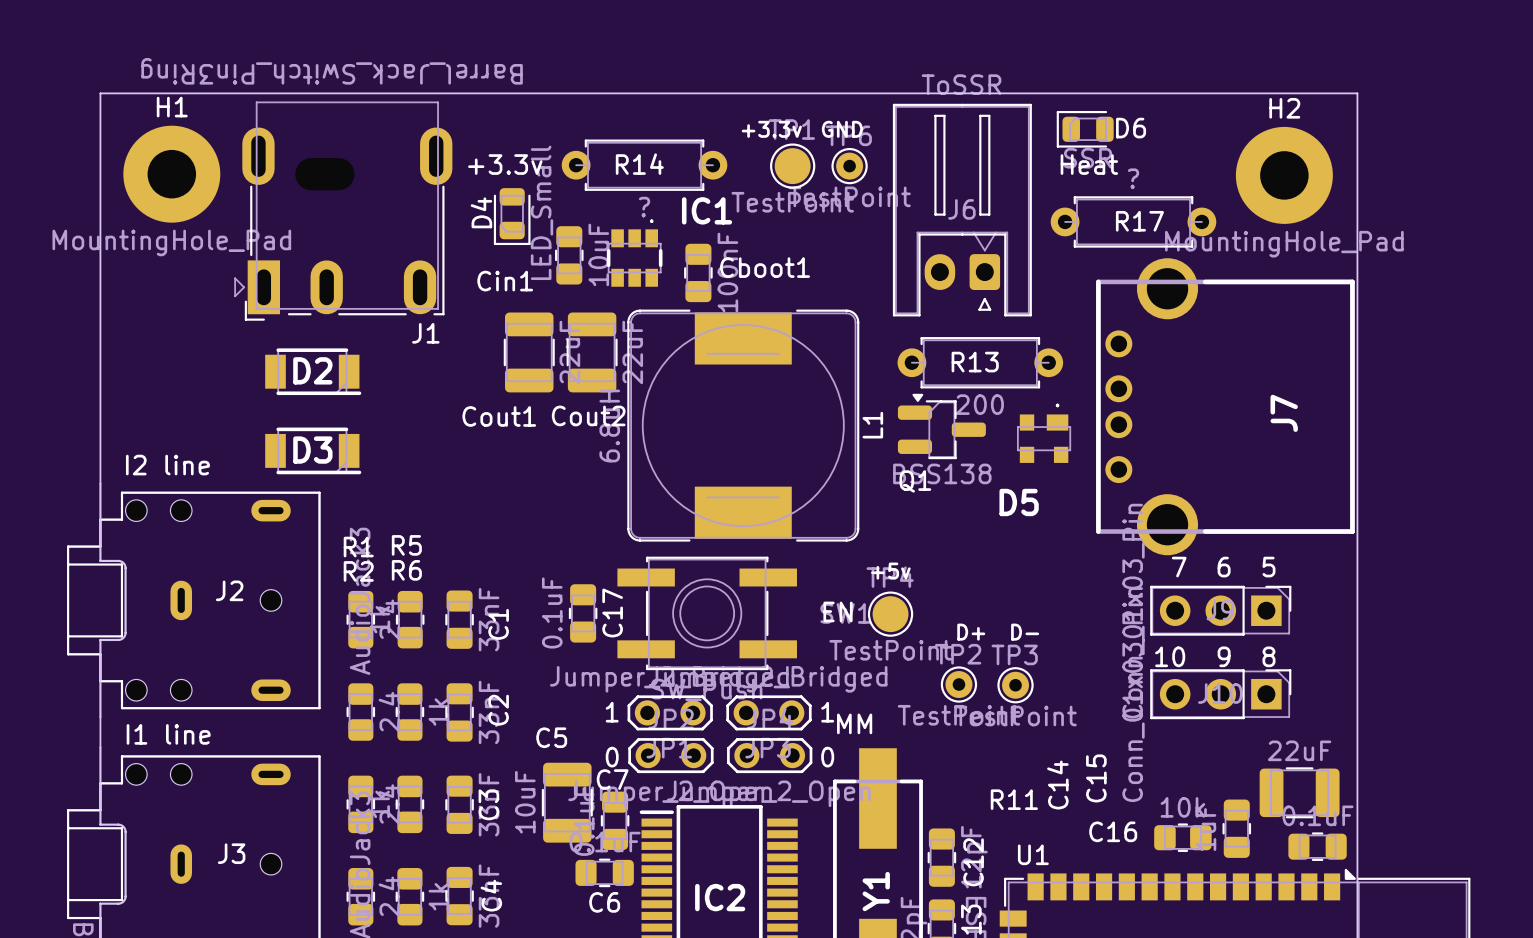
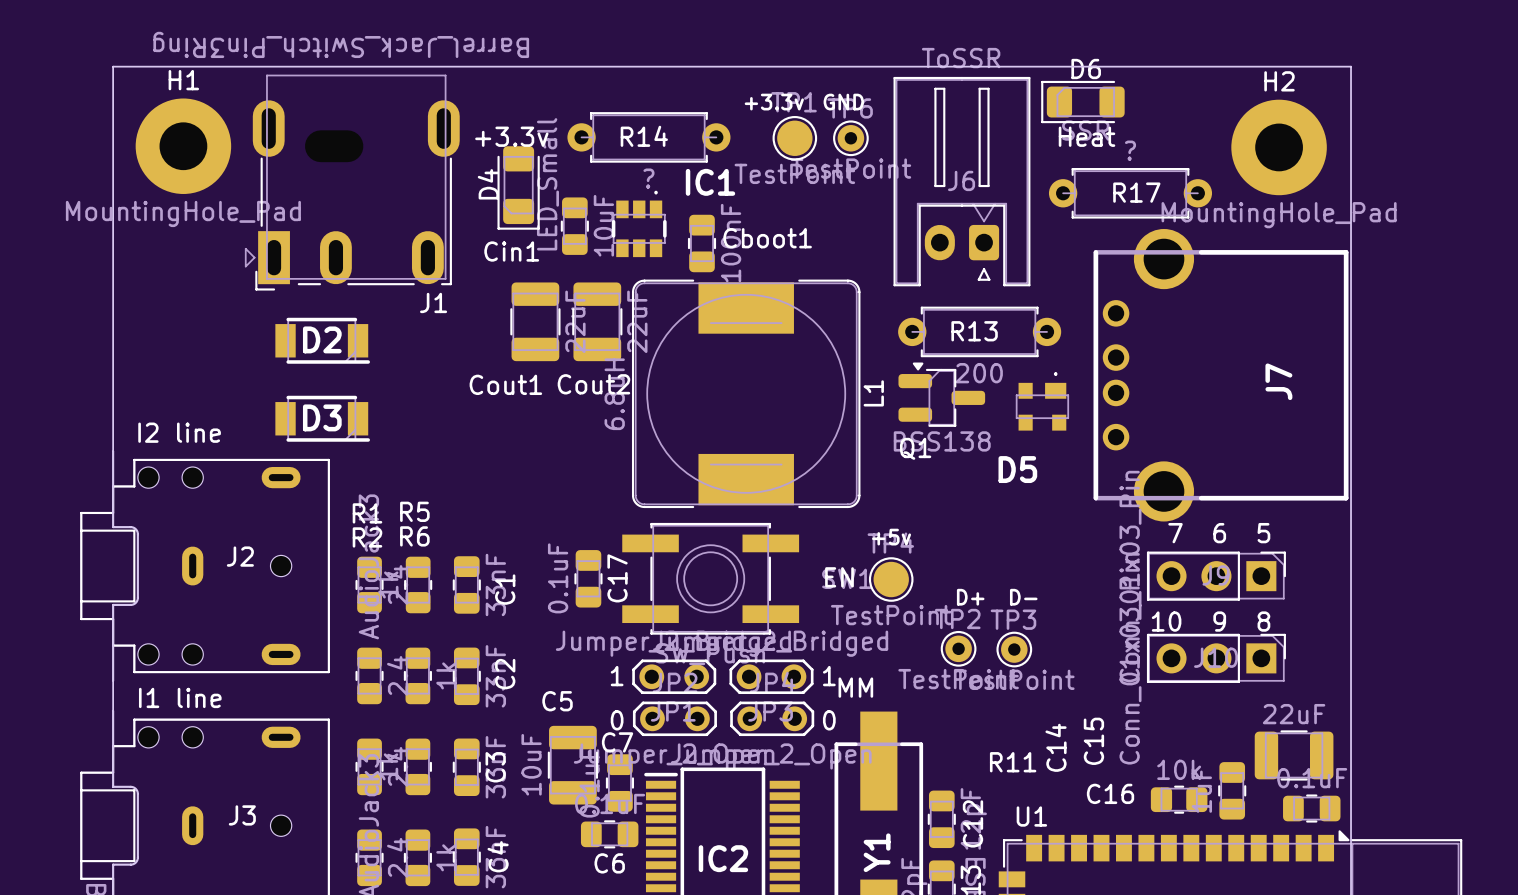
D6 footprint: [1056, 110, 1114, 148] -> [1041, 80, 1125, 124]
D6 name position: D6 (1131, 128) -> D6 (1086, 69)
D4 footprint: [493, 188, 531, 246] -> [497, 146, 540, 230]

